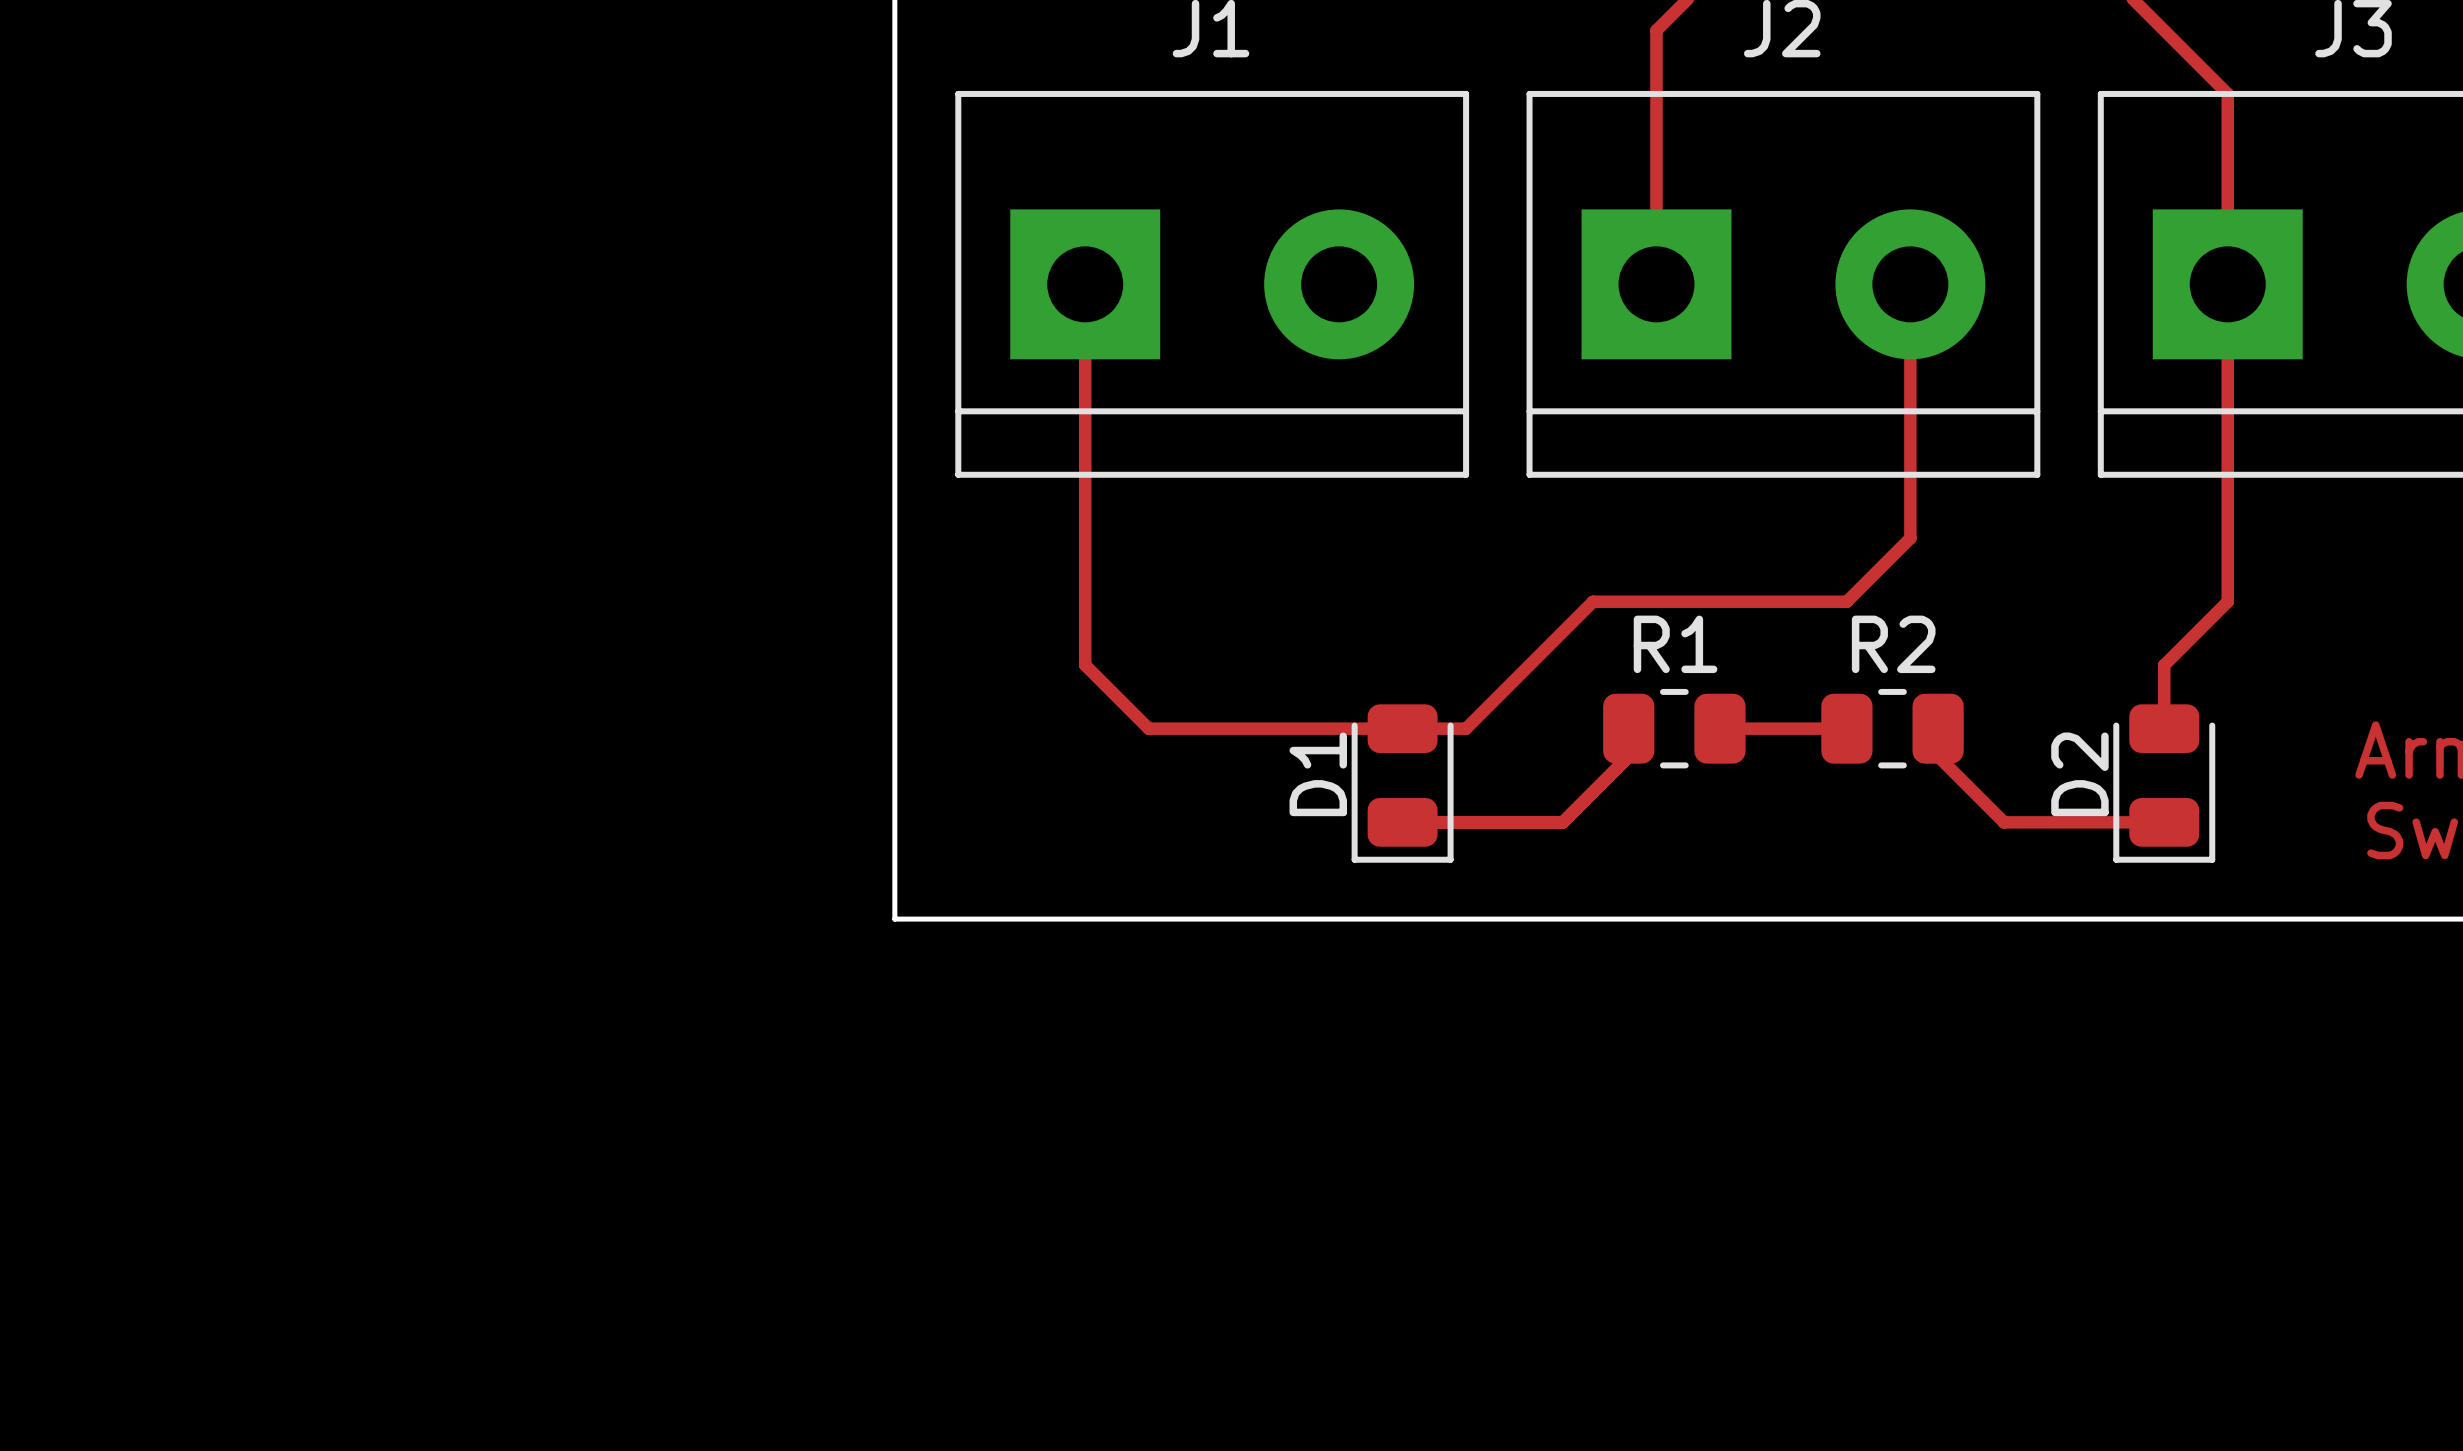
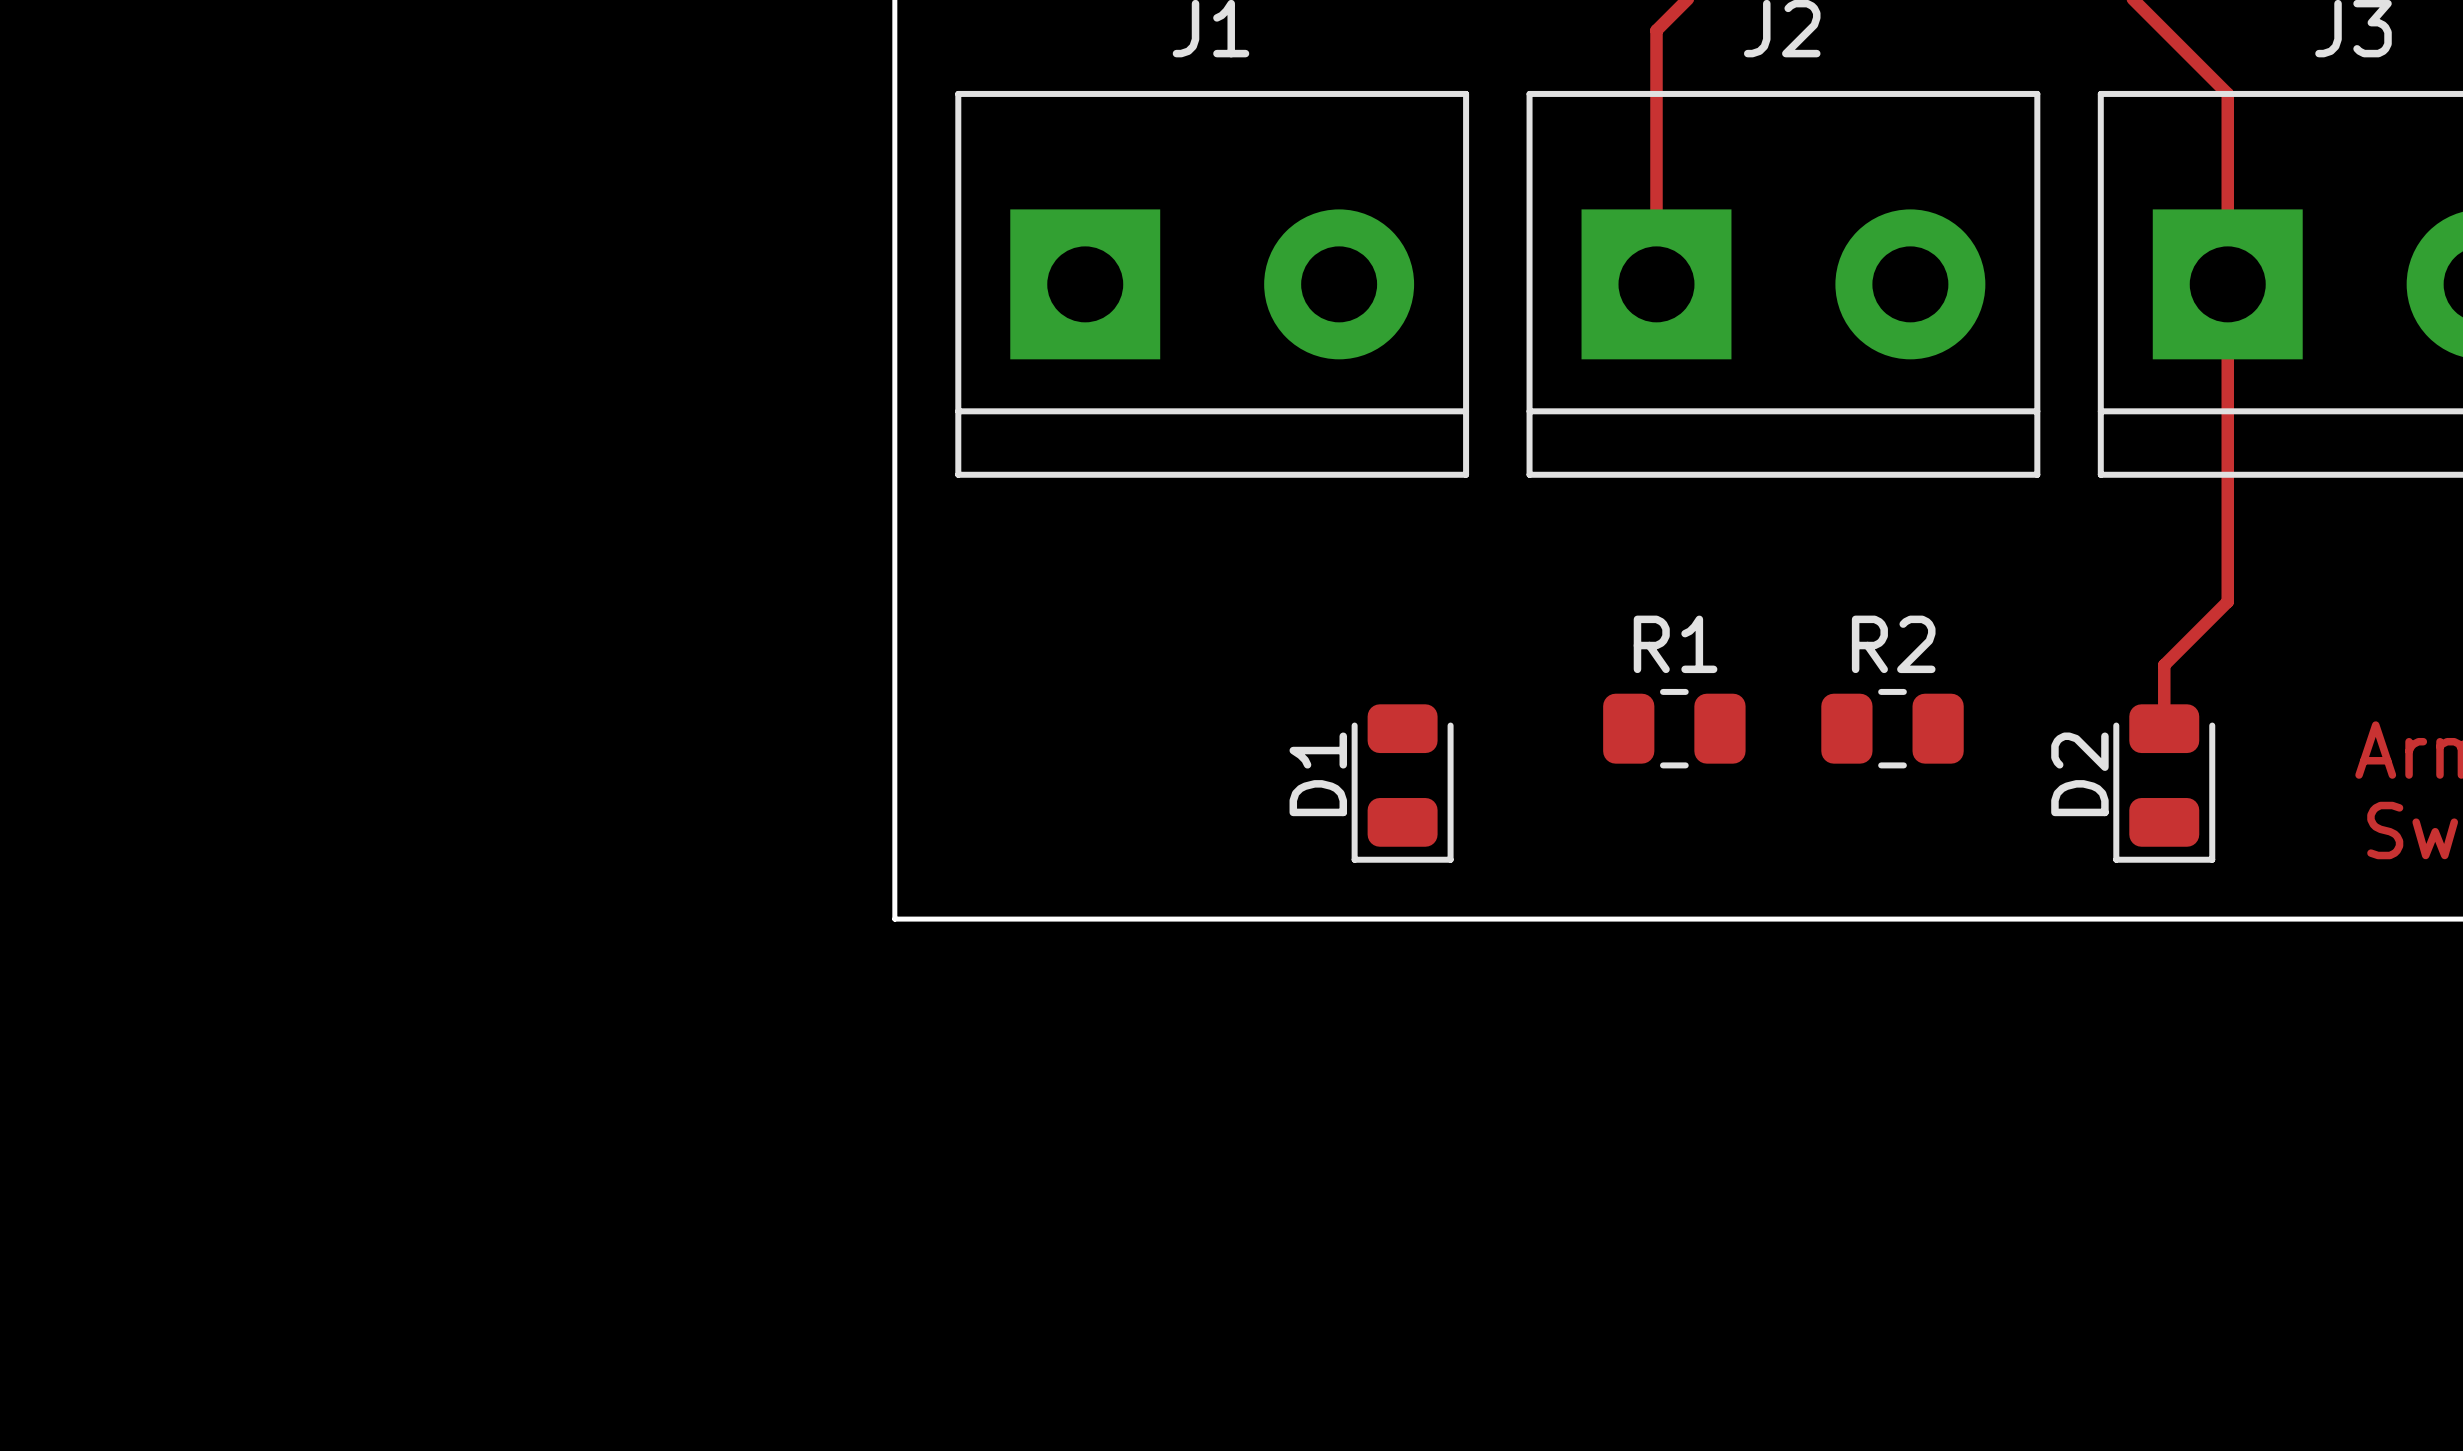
track: (1085, 284) (1085, 665) (1148, 728) (1466, 728) (1593, 601) (1846, 601) (1910, 538) (1910, 284) -> none
track: (1628, 728) (1628, 756) (1562, 822) (1402, 822) -> none
track: (1719, 728) (1846, 728) -> none
track: (1938, 728) (1938, 756) (2004, 822) (2164, 822) -> none

